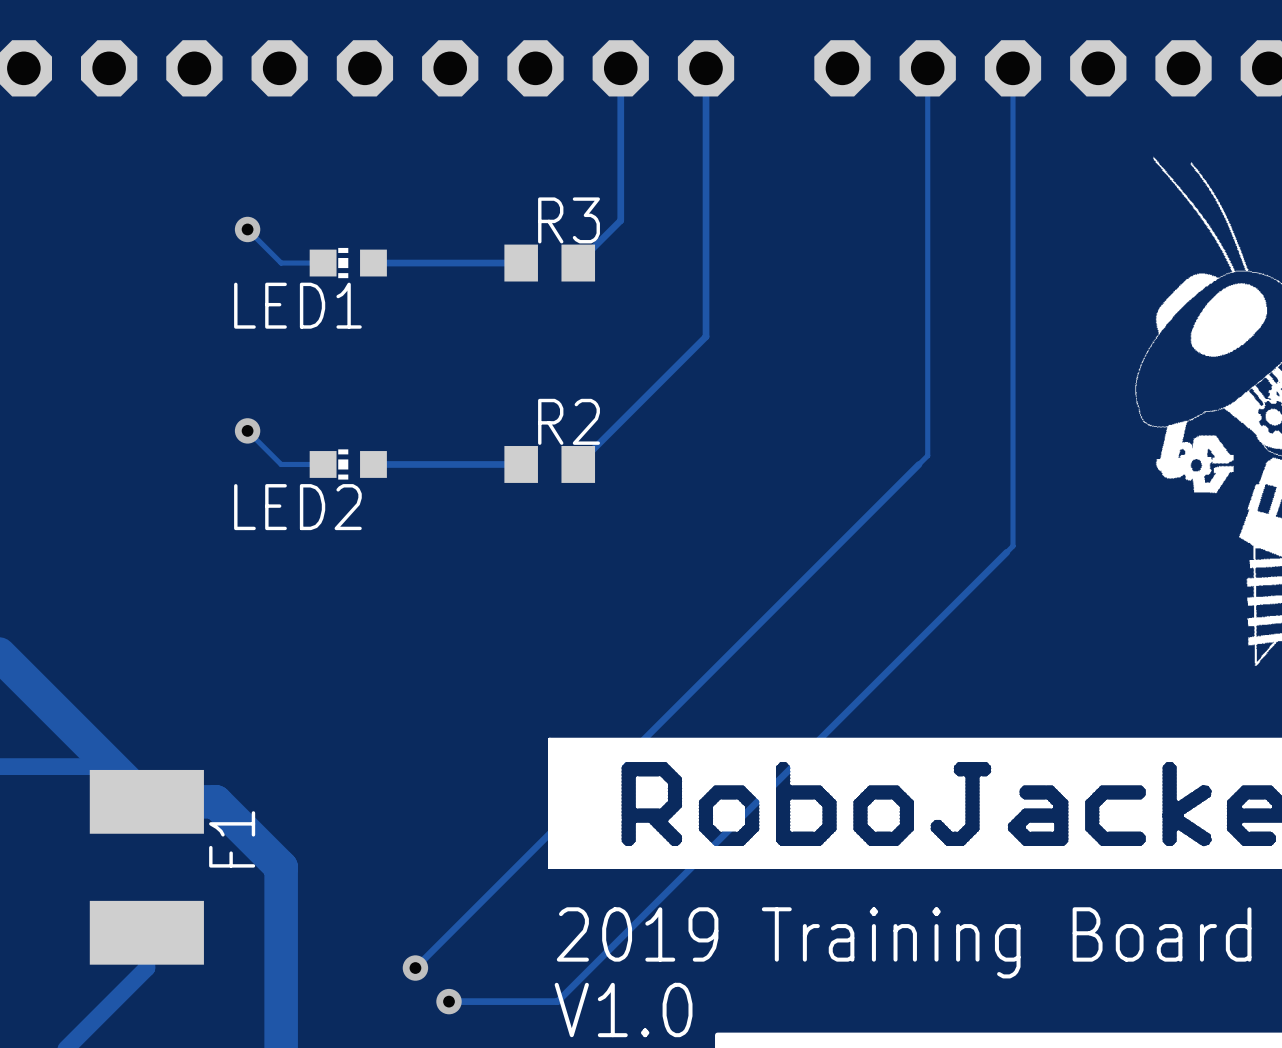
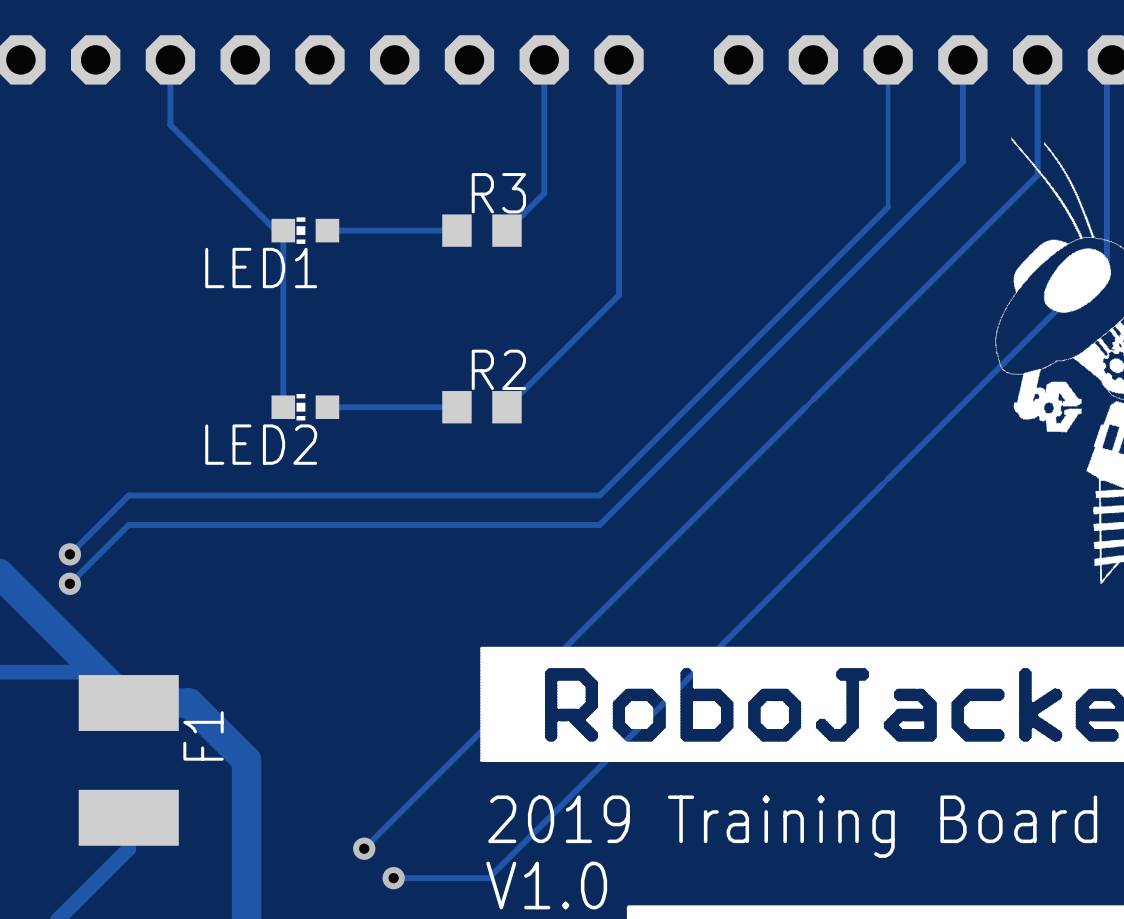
track: (927, 68) (927, 455) -> (1037, 59) (1037, 175) (813, 399)
track: none -> (962, 59) (962, 161) (599, 524) (128, 524) (69, 583)
track: (247, 229) (281, 263) (314, 263) -> (170, 59) (170, 125) (275, 230)
via: (247, 229) -> none
track: (1012, 236) (1012, 546) -> (1112, 59) (1106, 65) (1106, 260) (888, 478)
track: none -> (888, 207) (599, 495) (128, 495) (69, 554)
track: (247, 430) (281, 464) (323, 464) -> (283, 230) (283, 407)
via: (247, 430) -> none
via: none -> (69, 554)
via: none -> (69, 583)

